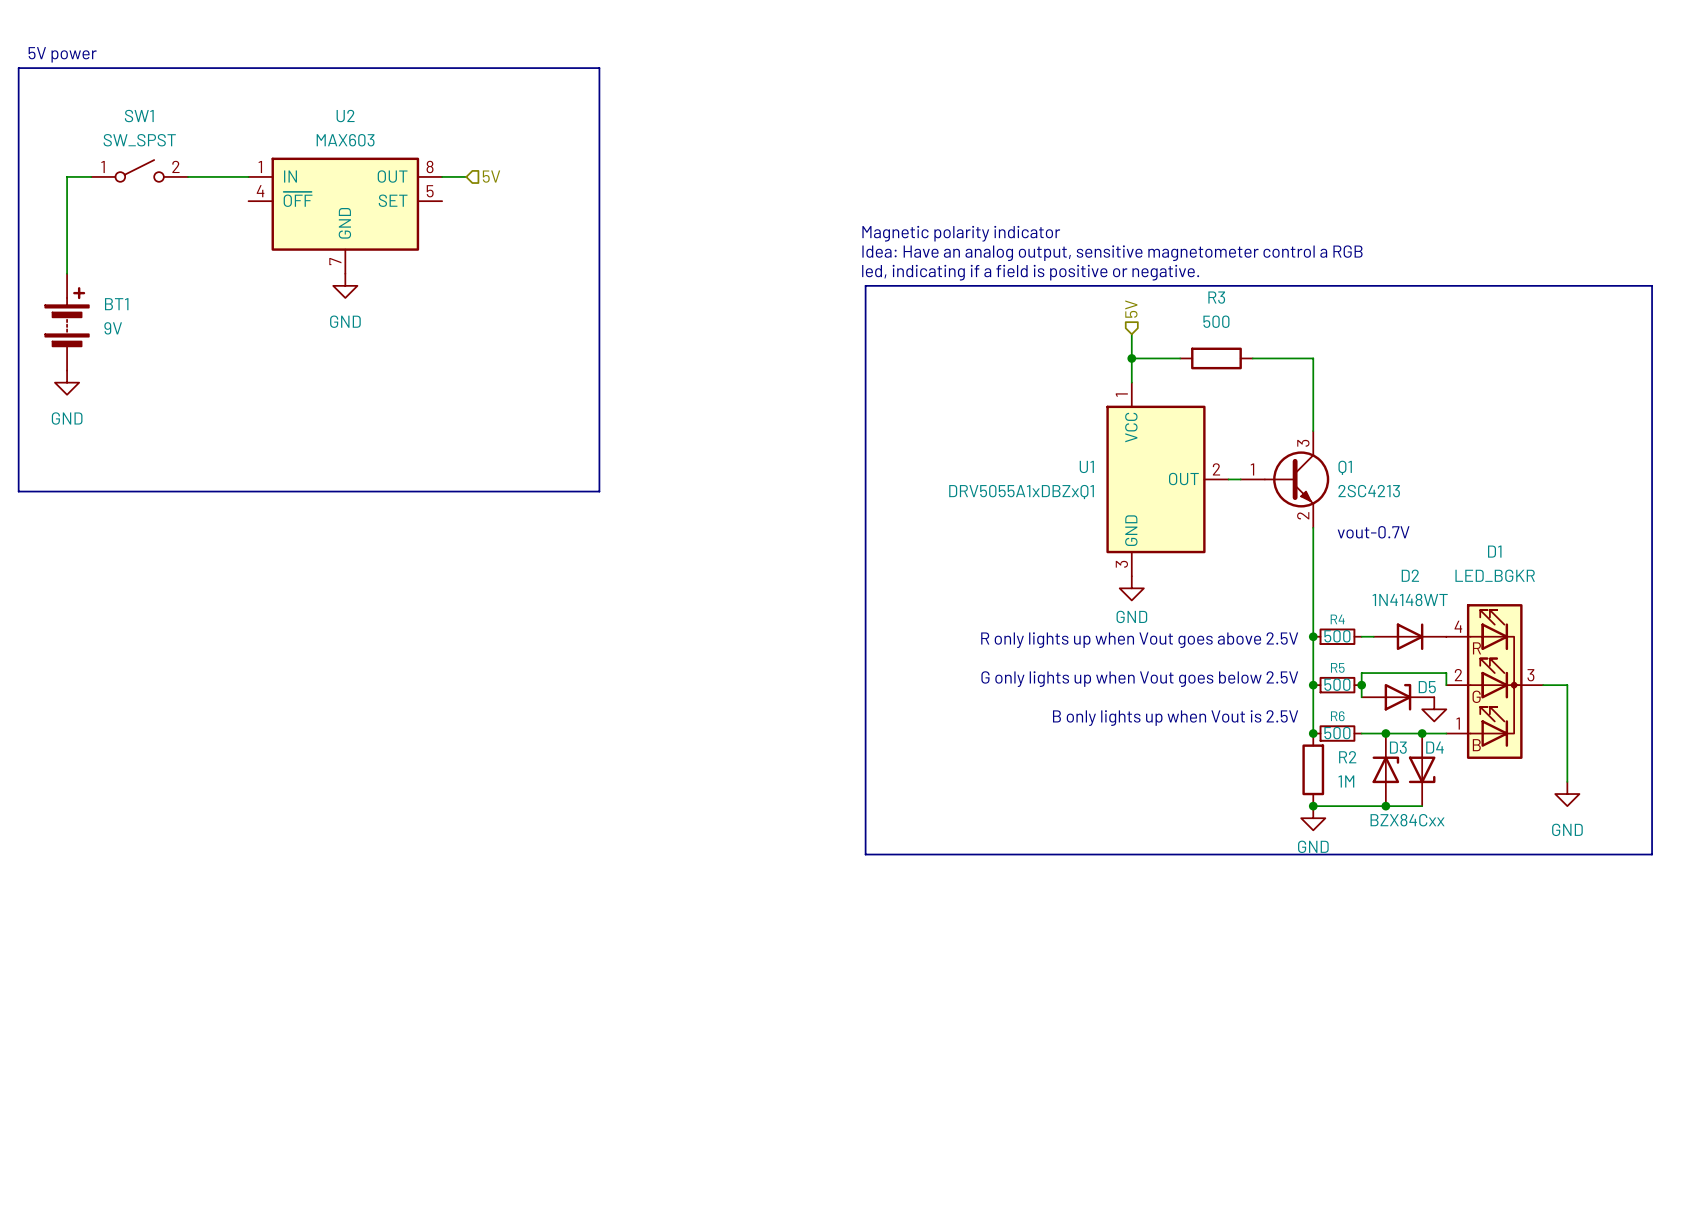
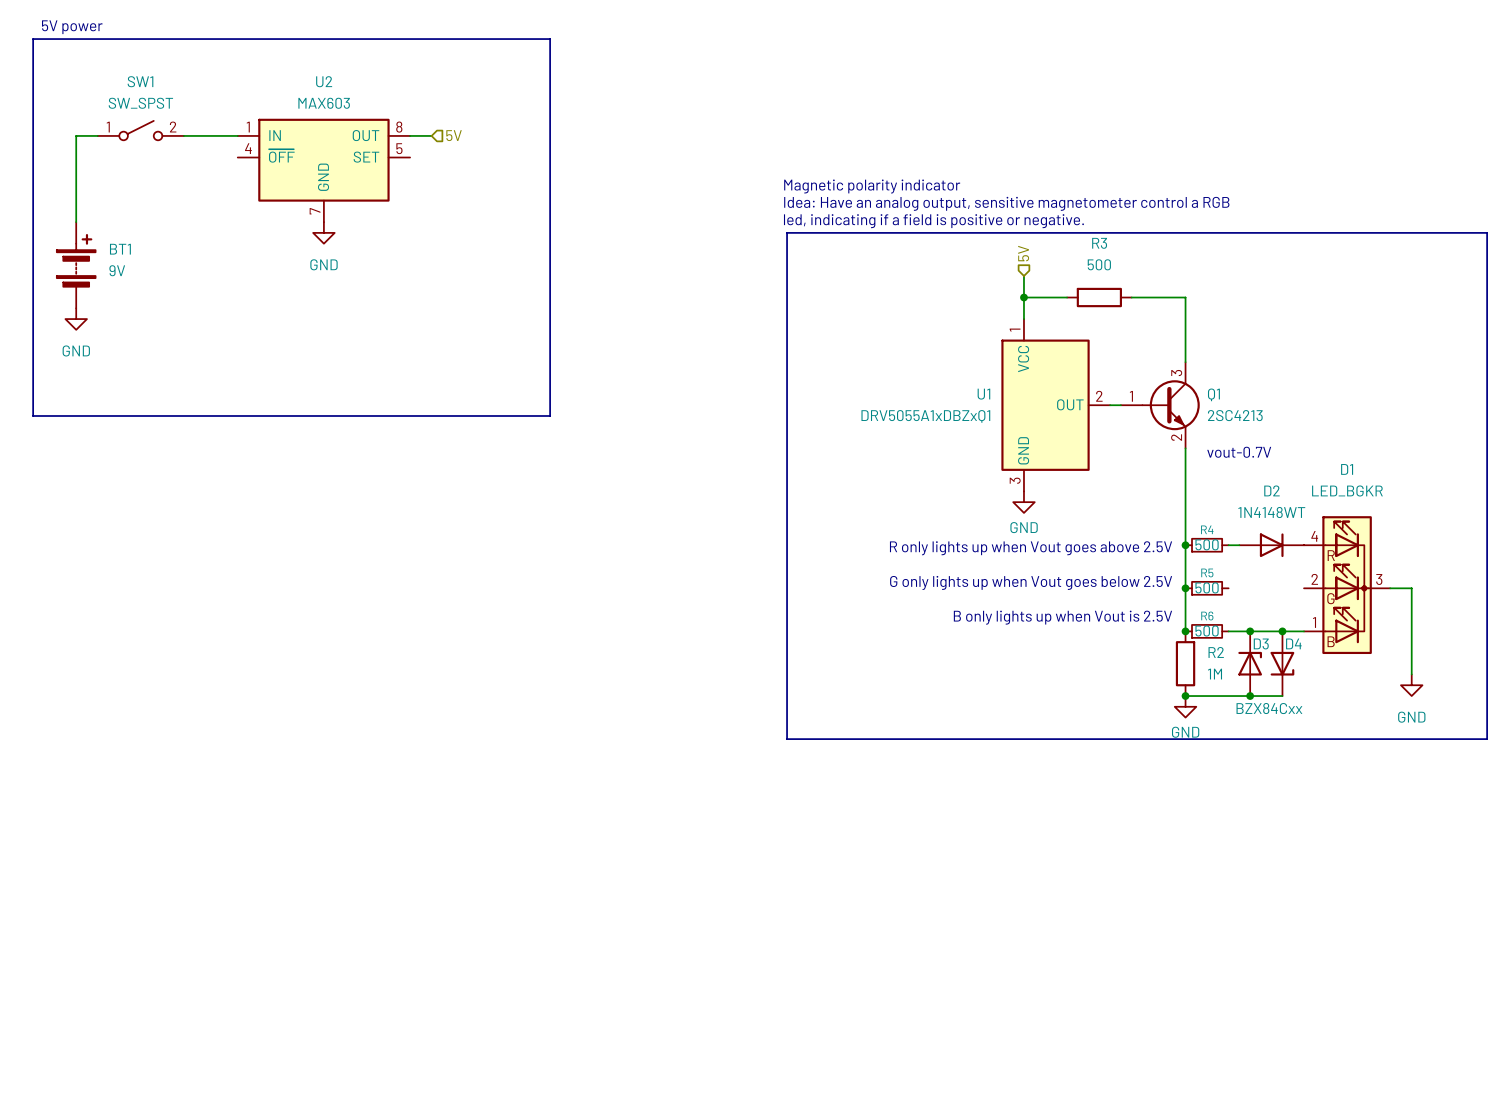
junction: (1361, 685) -> none
wire: (1446, 685) (1446, 673) (1361, 673) (1361, 697) -> none
D5: (1397, 697) -> none
power symbol: (1434, 709) -> none

